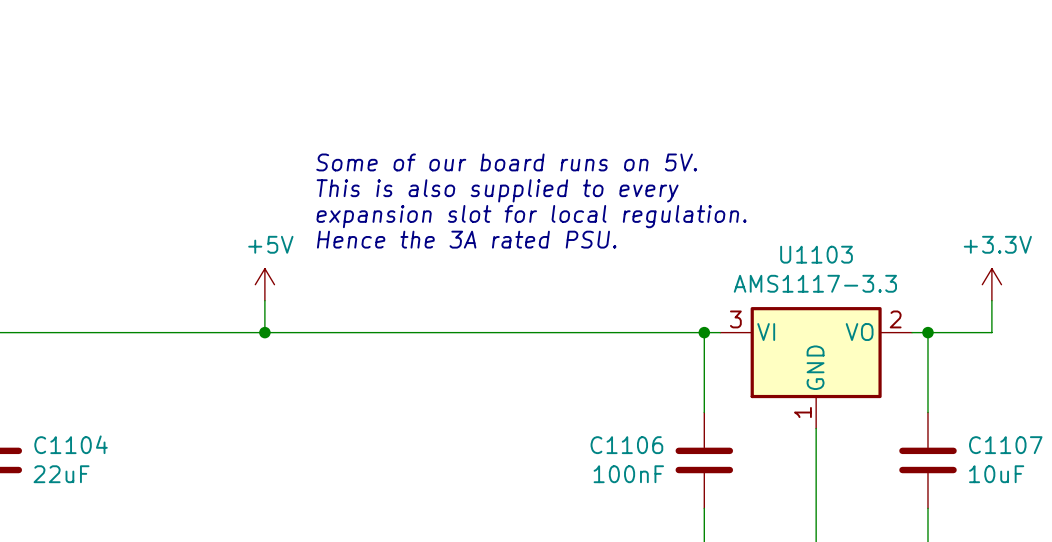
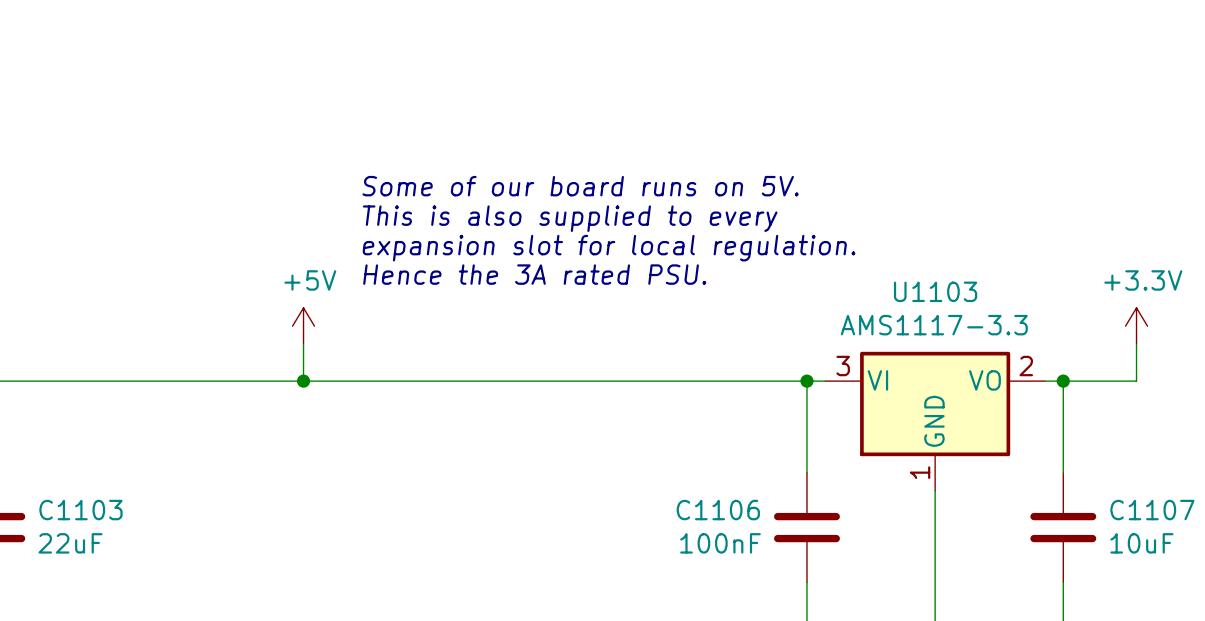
C1104 name: C1104 (71, 444) -> C1103 (80, 510)

